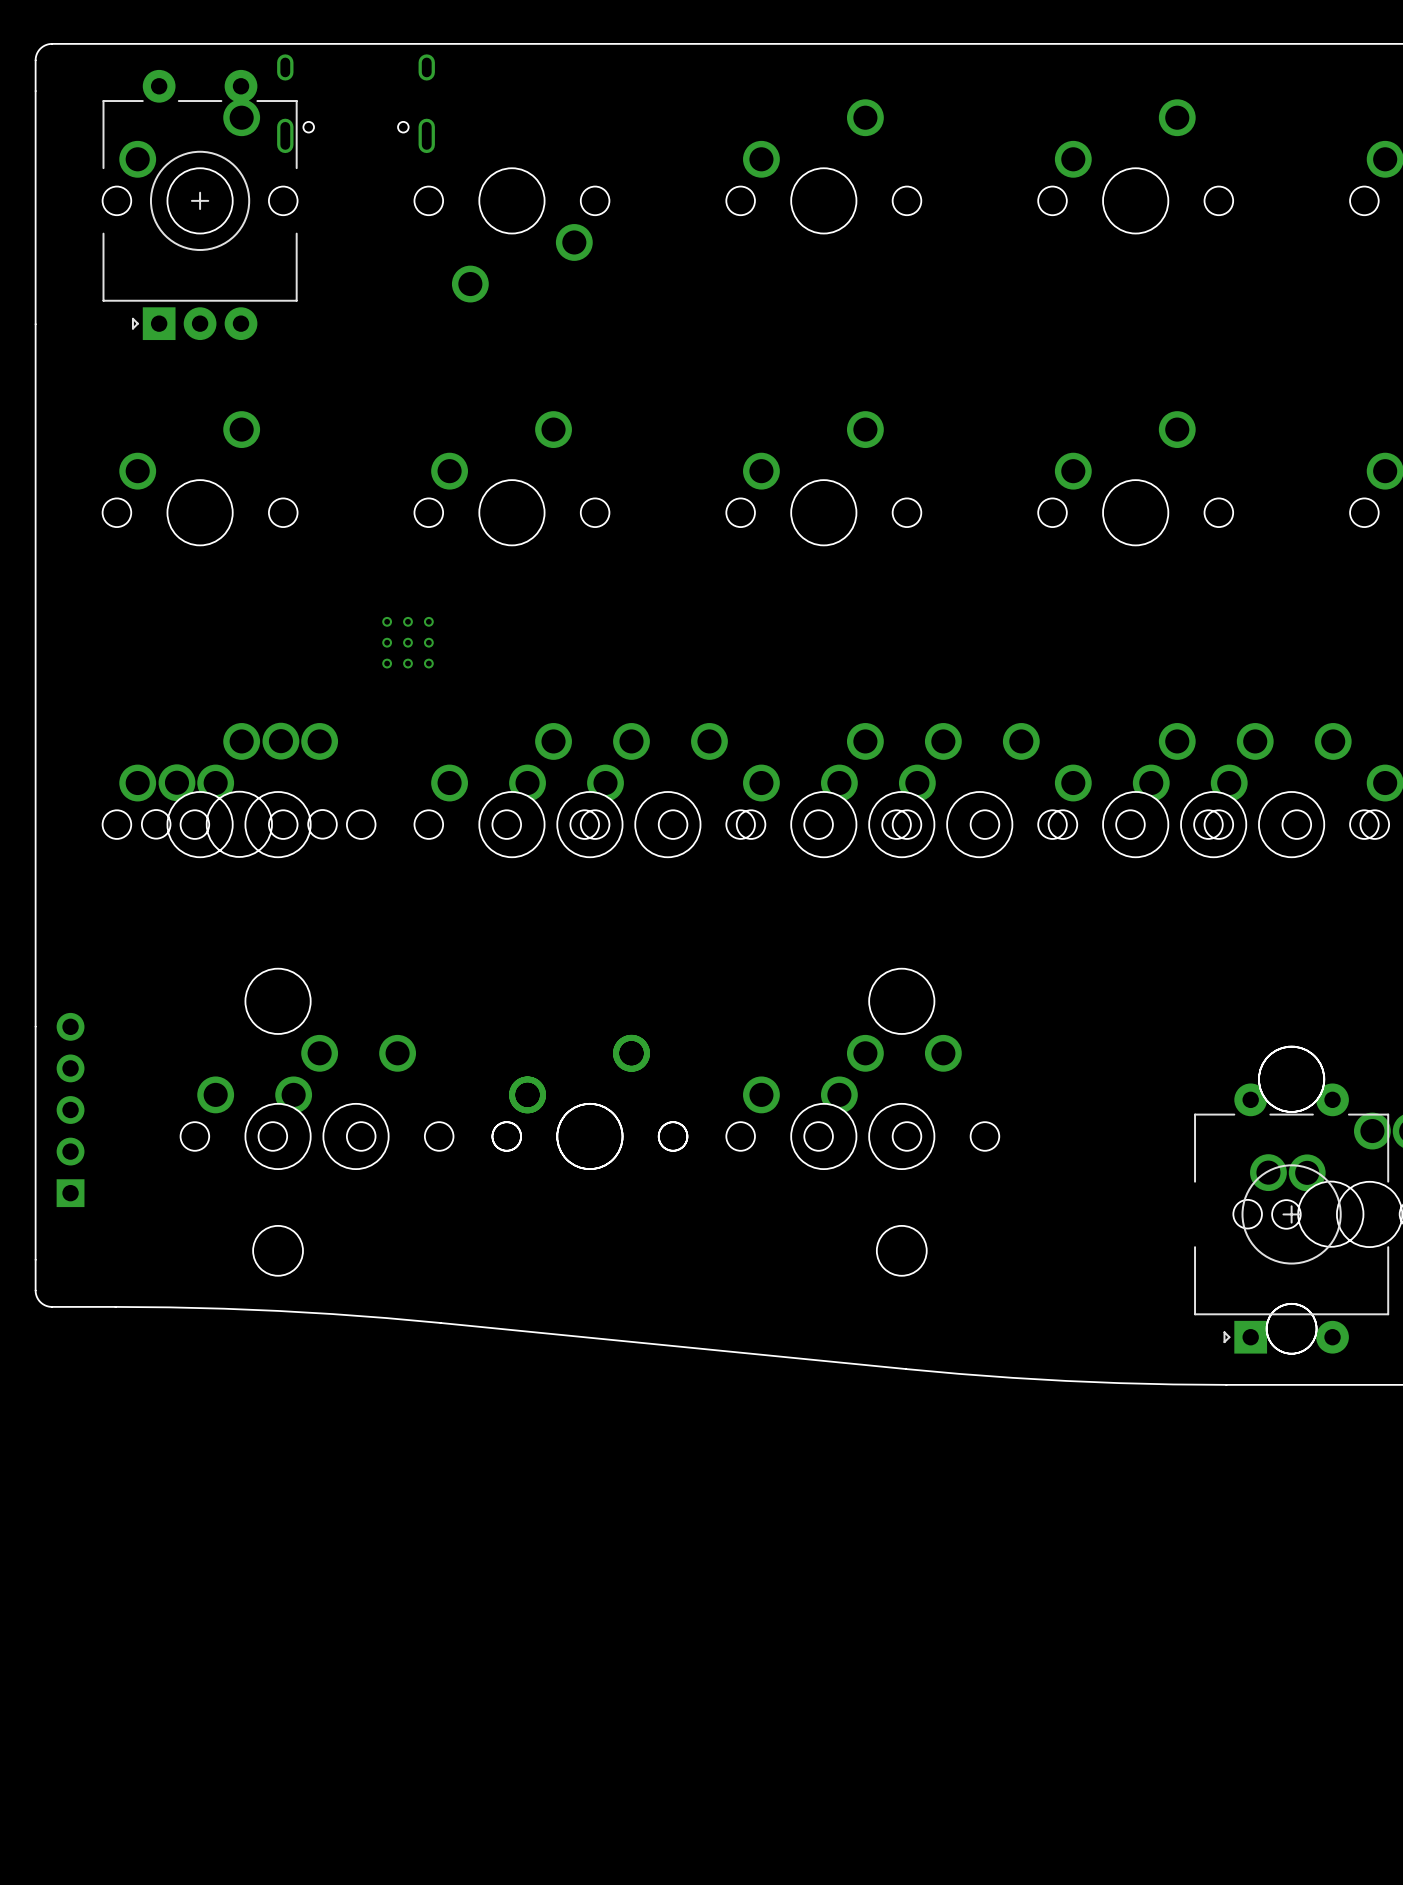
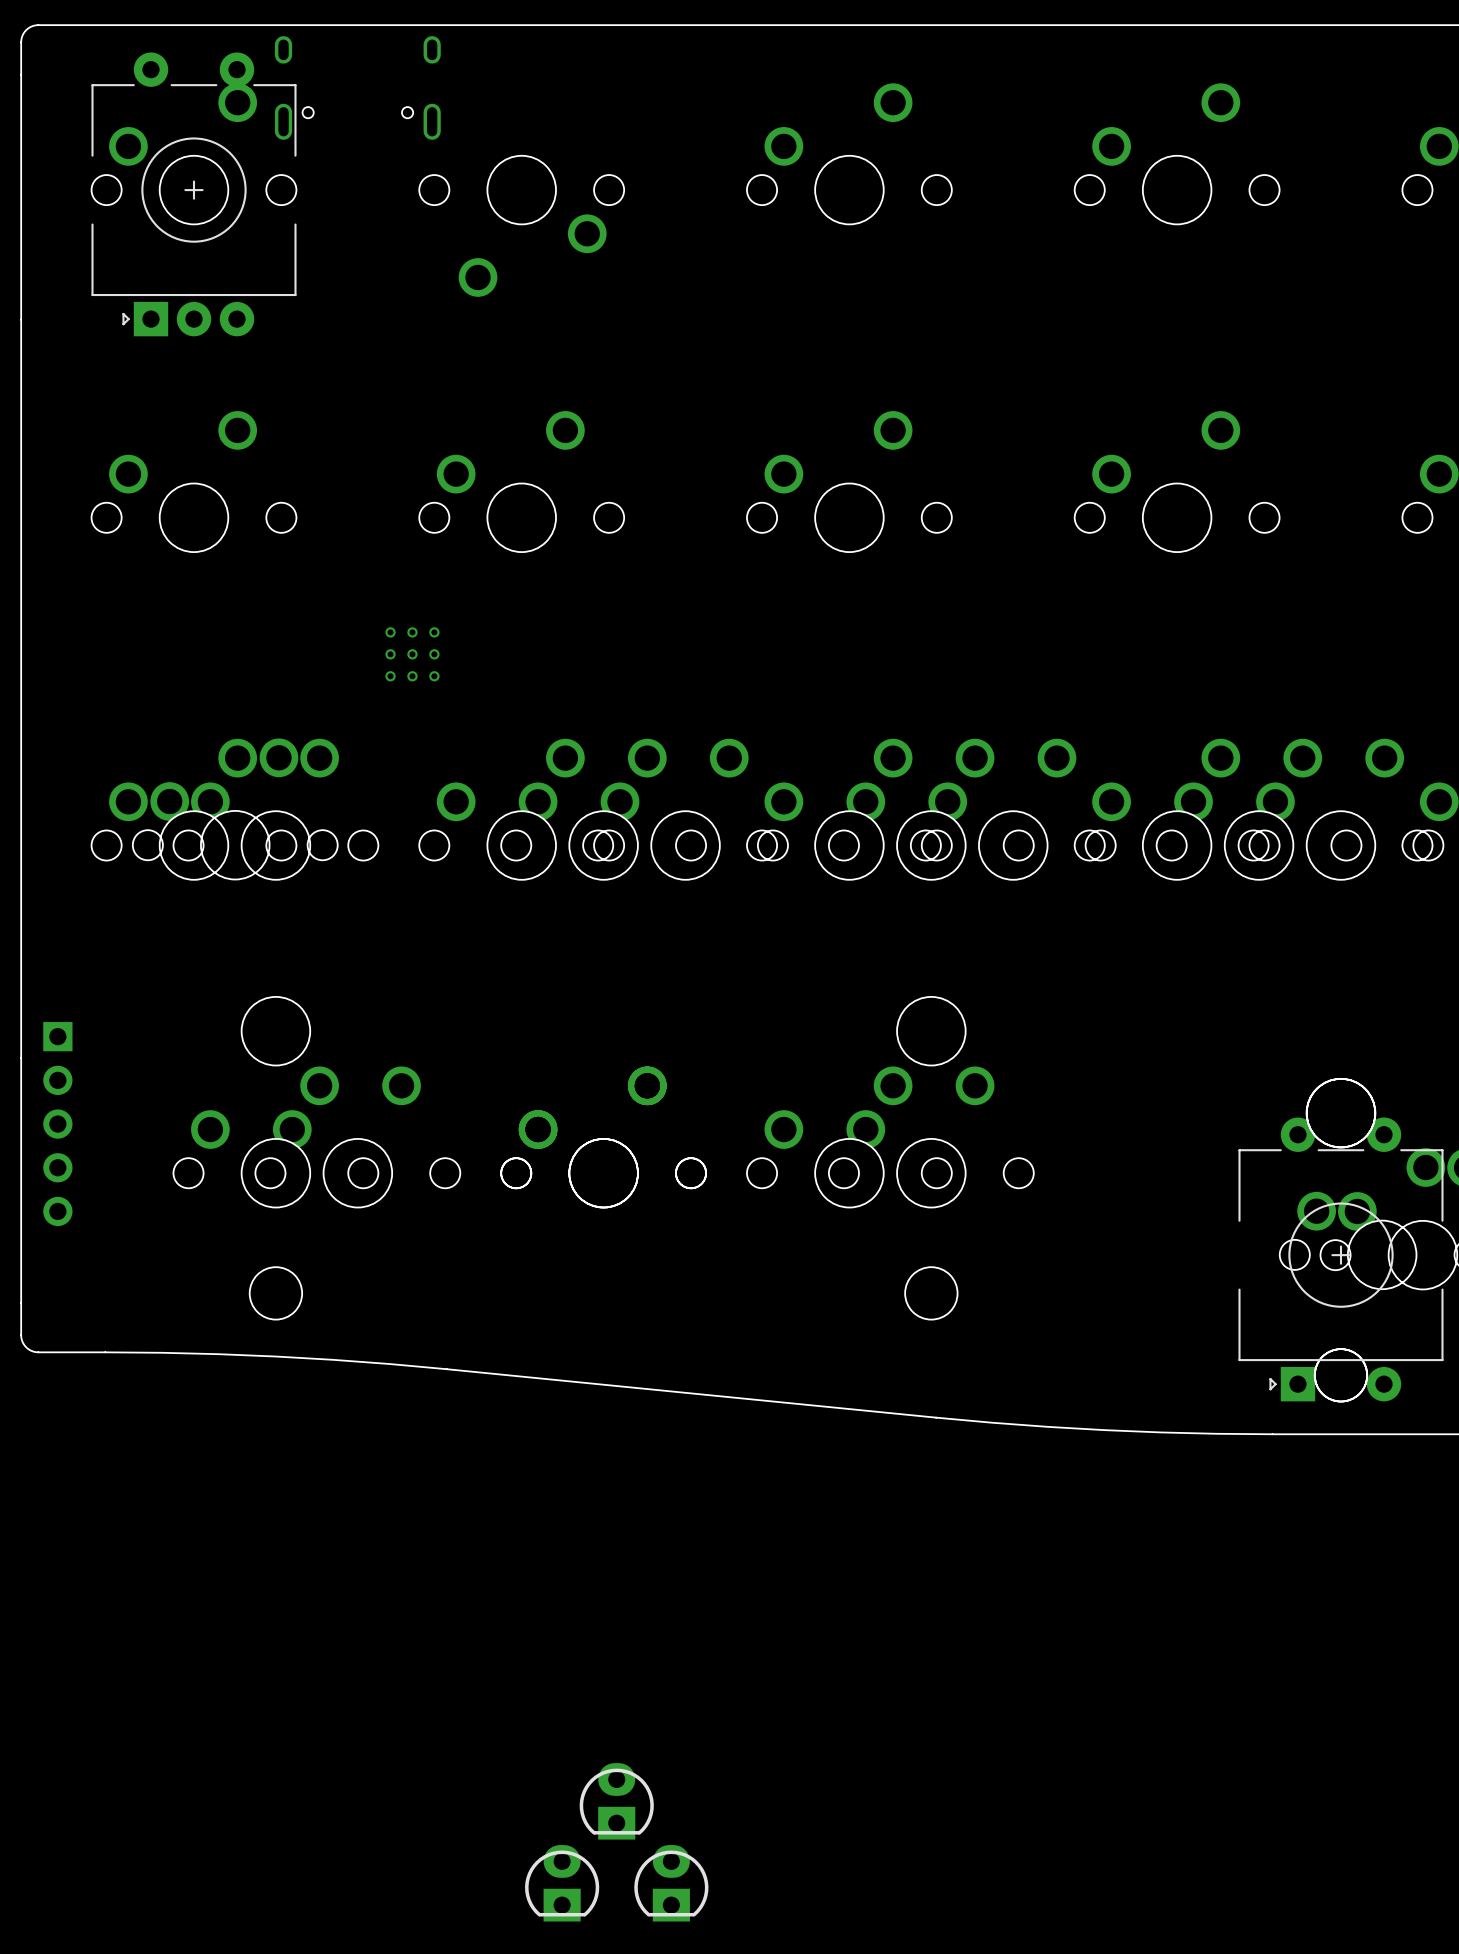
part rotation: 0° (70, 1109) -> 180° (57, 1124)
part: none -> (616, 1801)
part: none -> (562, 1883)
part: none -> (671, 1883)

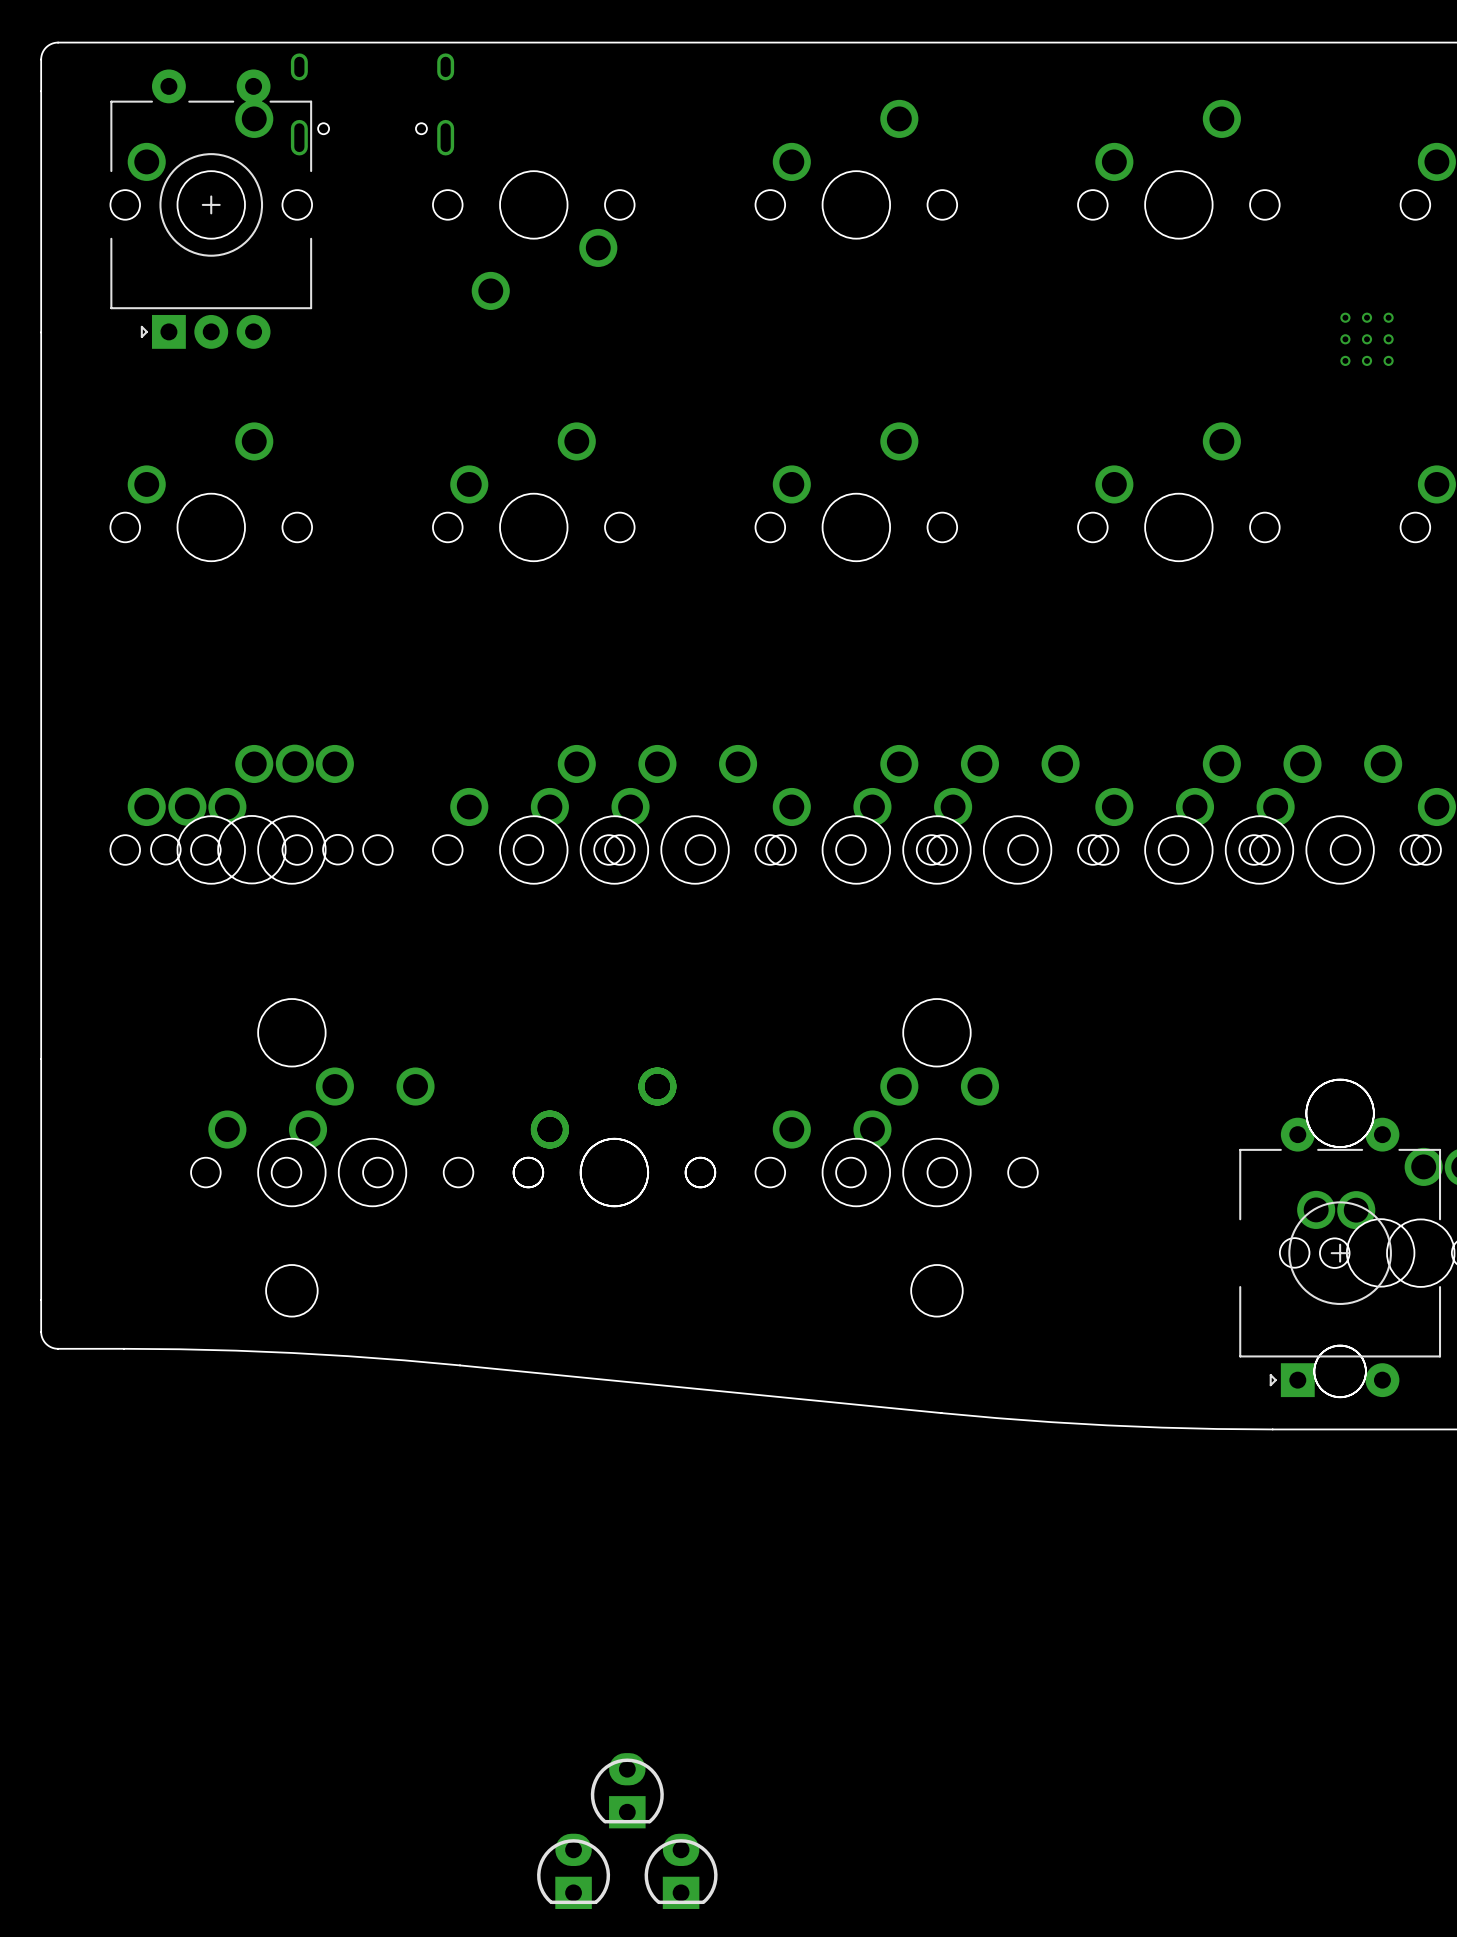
part: none -> (1367, 339)
part: (412, 654) -> none
part: (57, 1124) -> none

